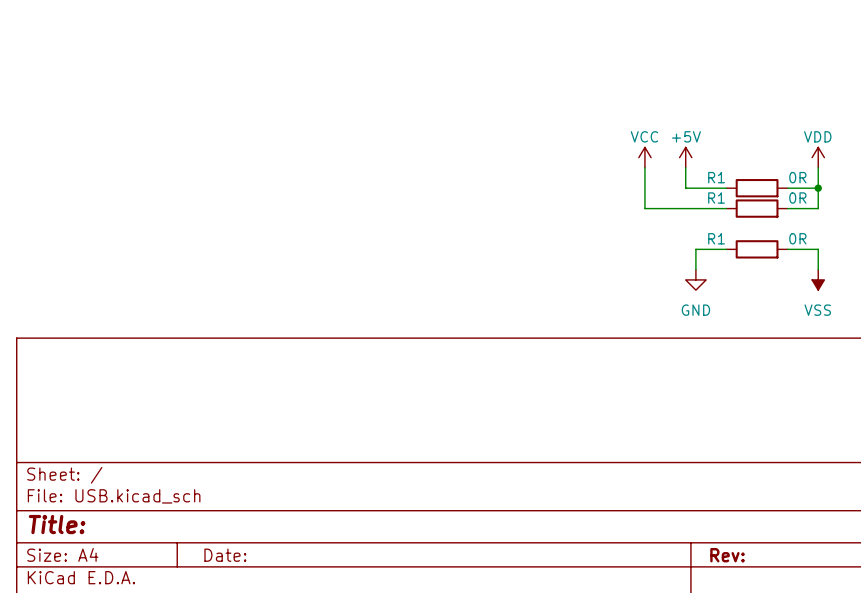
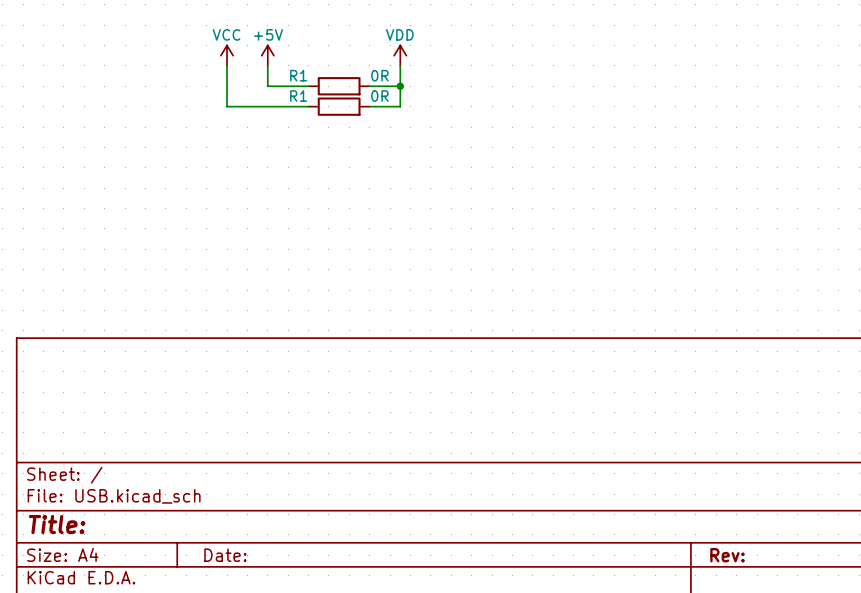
power symbol: none -> VCC (227, 55)
power symbol: none -> +5V (267, 55)
power symbol: none -> VDD (400, 55)
wire: none -> (227, 65) (227, 106) (308, 106)
wire: none -> (267, 65) (267, 86) (308, 86)
wire: none -> (400, 65) (400, 106) (369, 106)
R1: none -> 0R (339, 86)
wire: none -> (369, 86) (400, 86)
junction: none -> (400, 86)
R1: none -> 0R (339, 106)
power symbol: VCC (644, 157) -> none
power symbol: +5V (685, 157) -> none
power symbol: VDD (818, 157) -> none
wire: (644, 167) (644, 208) (726, 208) -> none
wire: (685, 167) (685, 188) (726, 188) -> none
wire: (818, 167) (818, 208) (787, 208) -> none
R1: 0R (757, 188) -> none
wire: (787, 188) (818, 188) -> none
junction: (818, 188) -> none
R1: 0R (757, 208) -> none
wire: (726, 249) (695, 249) (695, 269) -> none
R1: 0R (757, 249) -> none
wire: (787, 249) (818, 249) (818, 269) -> none
power symbol: GND (695, 279) -> none
power symbol: VSS (818, 279) -> none

